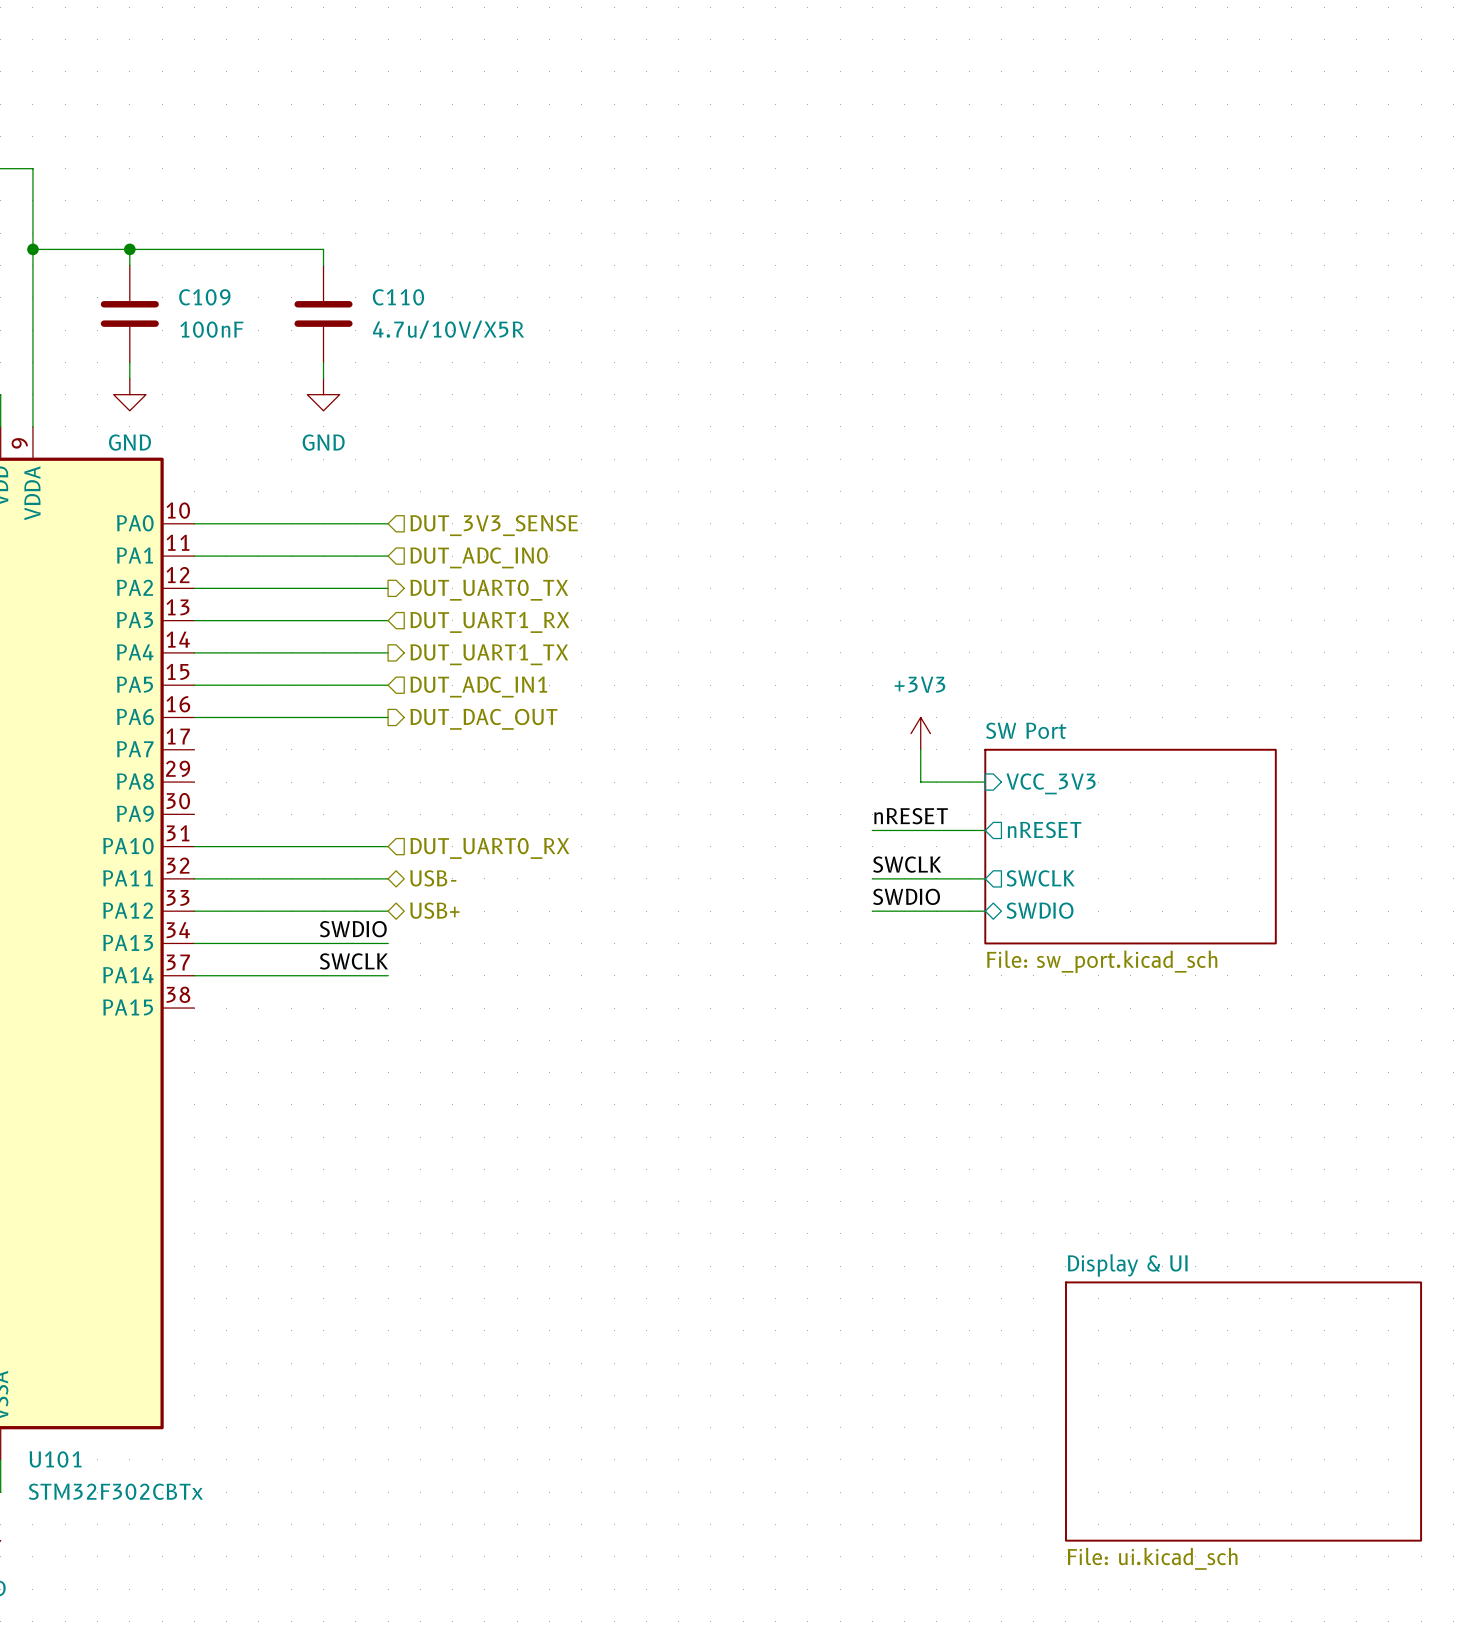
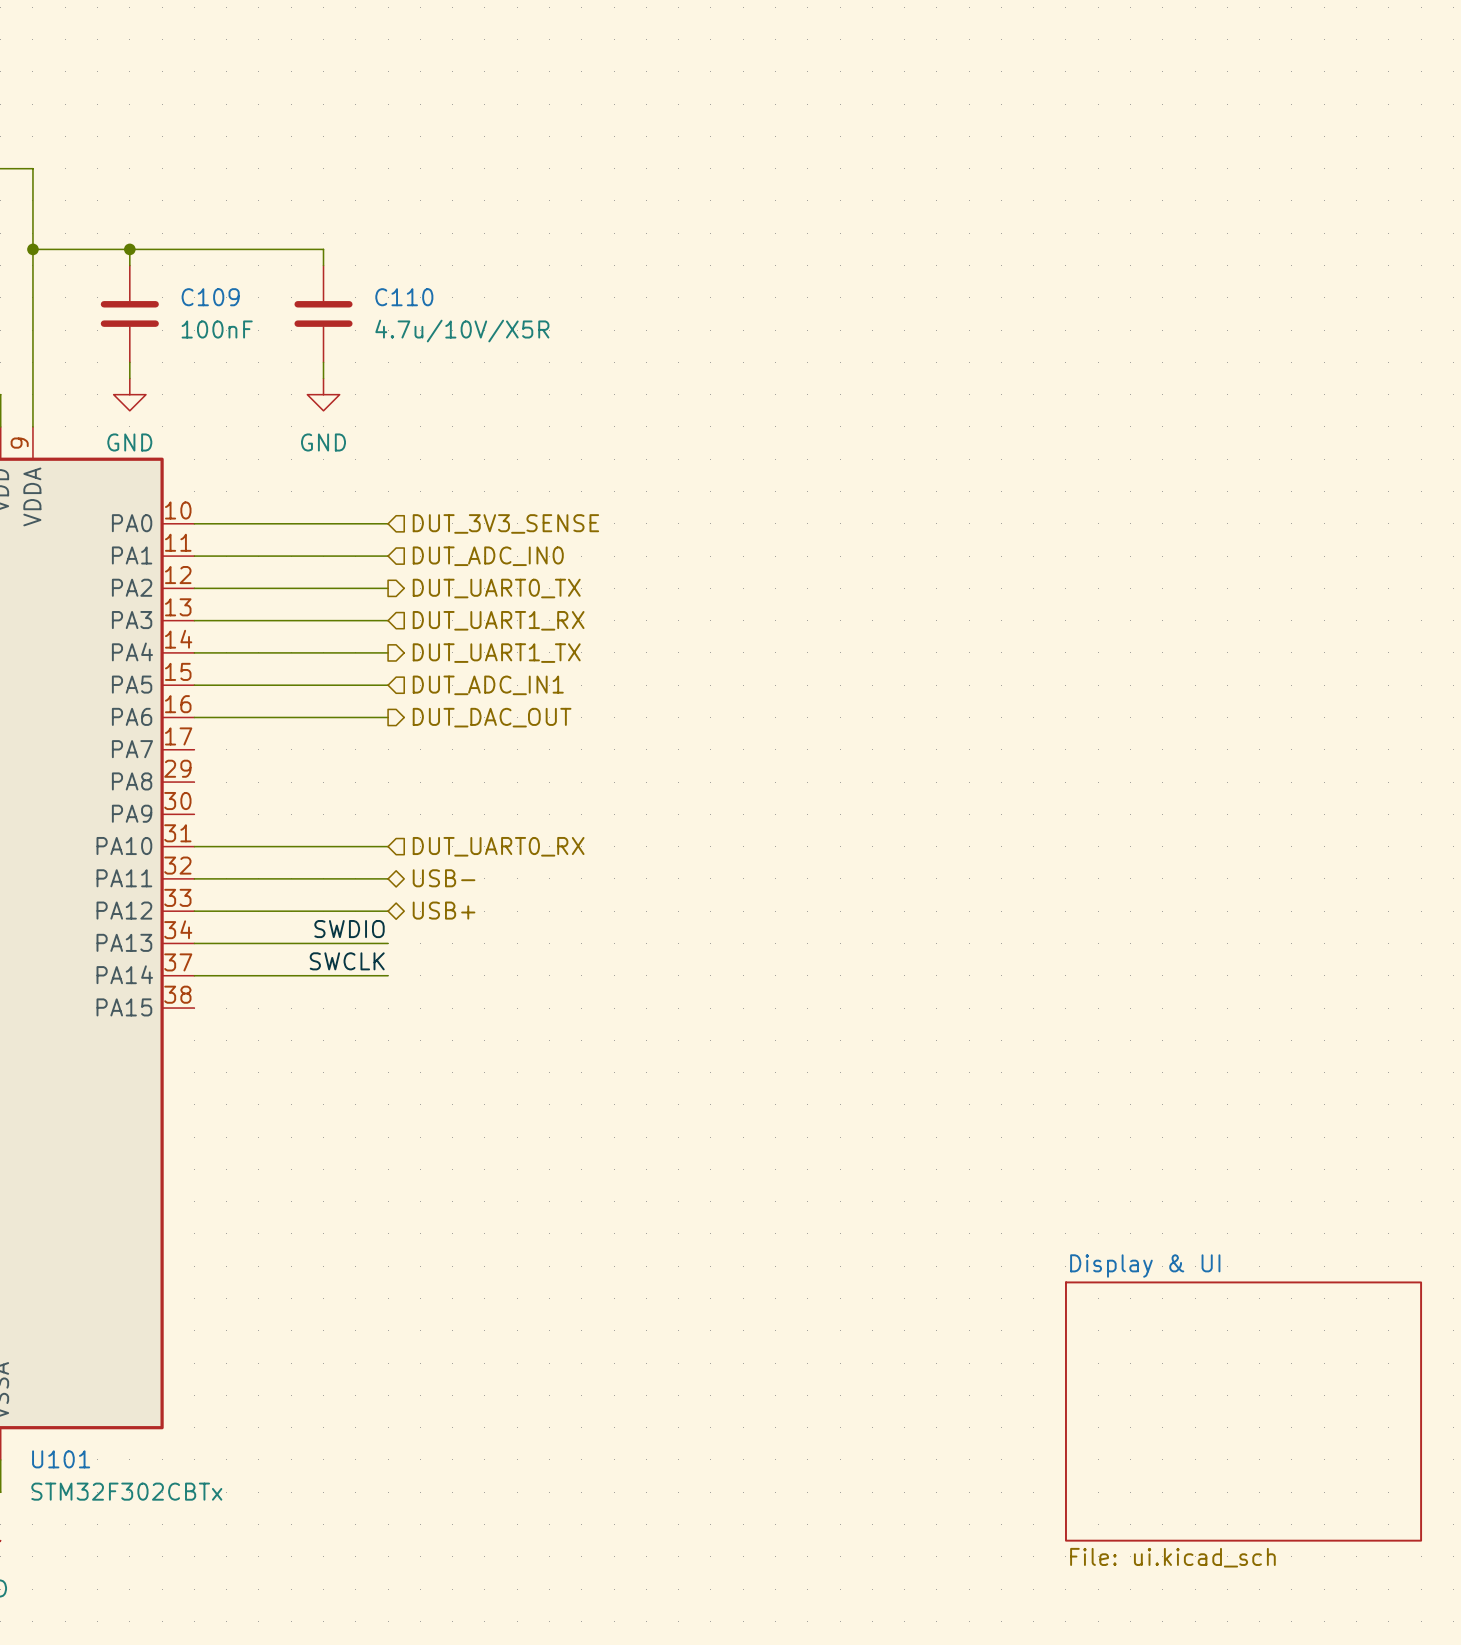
power symbol: +3V3 (920, 733) -> none
wire: (920, 749) (920, 782) (985, 782) -> none
sheet pin: VCC_3V3 (1051, 783) -> none
label: nRESET (911, 816) -> none
sheet pin: nRESET (1044, 829) -> none
wire: (872, 830) (985, 830) -> none
sheet SW Port: File: sw_port.kicad_sch (1130, 846) -> none
label: SWCLK (907, 864) -> none
wire: (872, 878) (985, 878) -> none
sheet pin: SWCLK (1040, 878) -> none
label: SWDIO (906, 896) -> none
sheet pin: SWDIO (1040, 910) -> none
wire: (872, 911) (985, 911) -> none

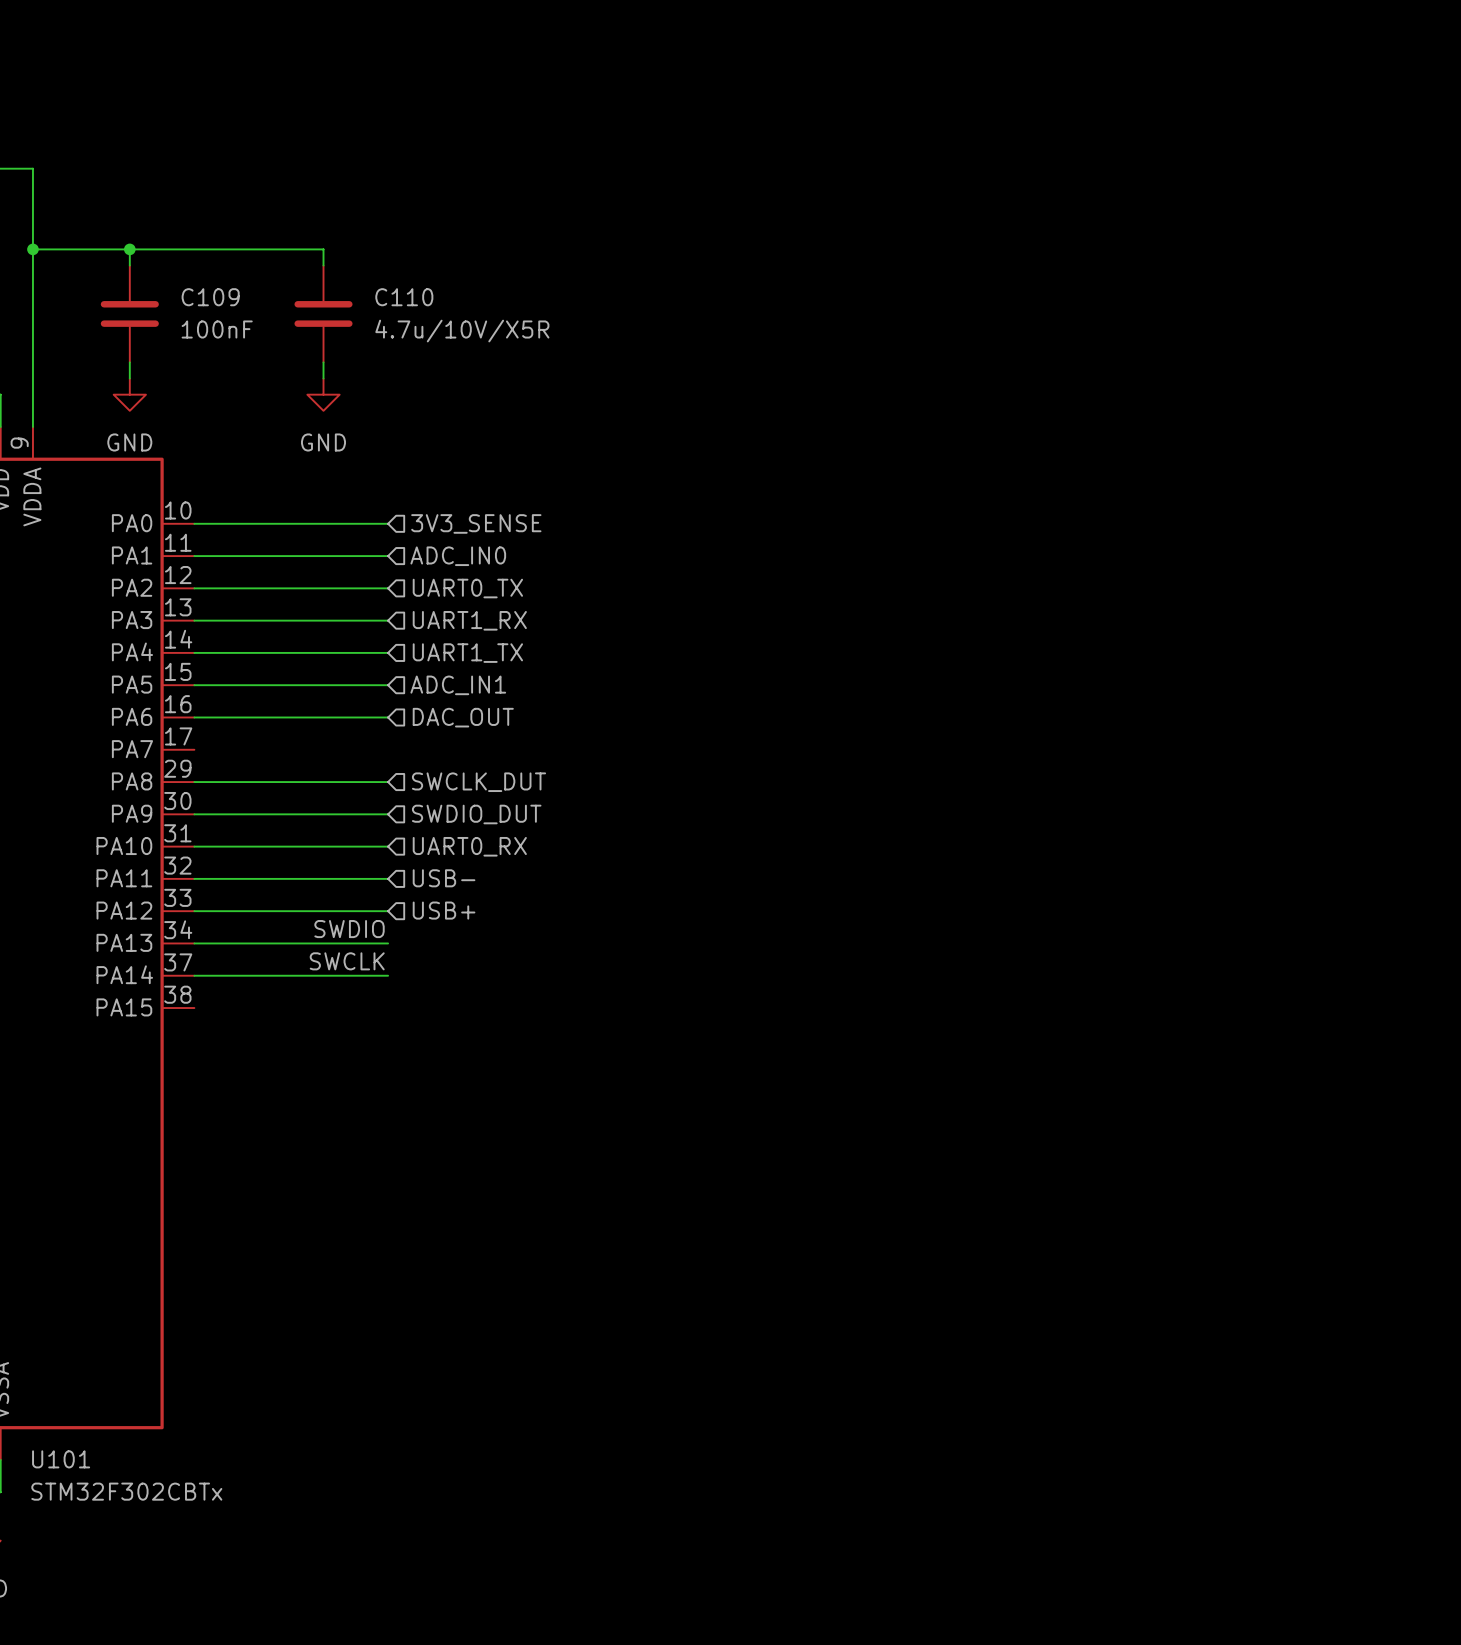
hierarchical label: DUT_3V3_SENSE (505, 523) -> 3V3_SENSE (476, 523)
hierarchical label: DUT_ADC_IN0 (488, 556) -> ADC_IN0 (458, 556)
hierarchical label shape: output (496, 588) -> input (467, 588)
hierarchical label: DUT_UART0_TX (496, 588) -> UART0_TX (467, 588)
hierarchical label: DUT_UART1_RX (498, 620) -> UART1_RX (469, 620)
hierarchical label shape: output (496, 653) -> input (467, 653)
hierarchical label: DUT_UART1_TX (496, 653) -> UART1_TX (467, 653)
hierarchical label: DUT_ADC_IN1 (488, 685) -> ADC_IN1 (458, 685)
hierarchical label shape: output (492, 717) -> input (463, 717)
hierarchical label: DUT_DAC_OUT (492, 717) -> DAC_OUT (463, 717)
wire: none -> (194, 782) (388, 782)
hierarchical label: none -> SWCLK_DUT (479, 782)
wire: none -> (194, 814) (388, 814)
hierarchical label: none -> SWDIO_DUT (476, 814)
hierarchical label: DUT_UART0_RX (498, 846) -> UART0_RX (469, 846)
hierarchical label shape: bidirectional (444, 878) -> input (444, 878)
hierarchical label shape: bidirectional (444, 910) -> input (444, 910)
sheet Display & UI: File: ui.kicad_sch (1243, 1411) -> none

